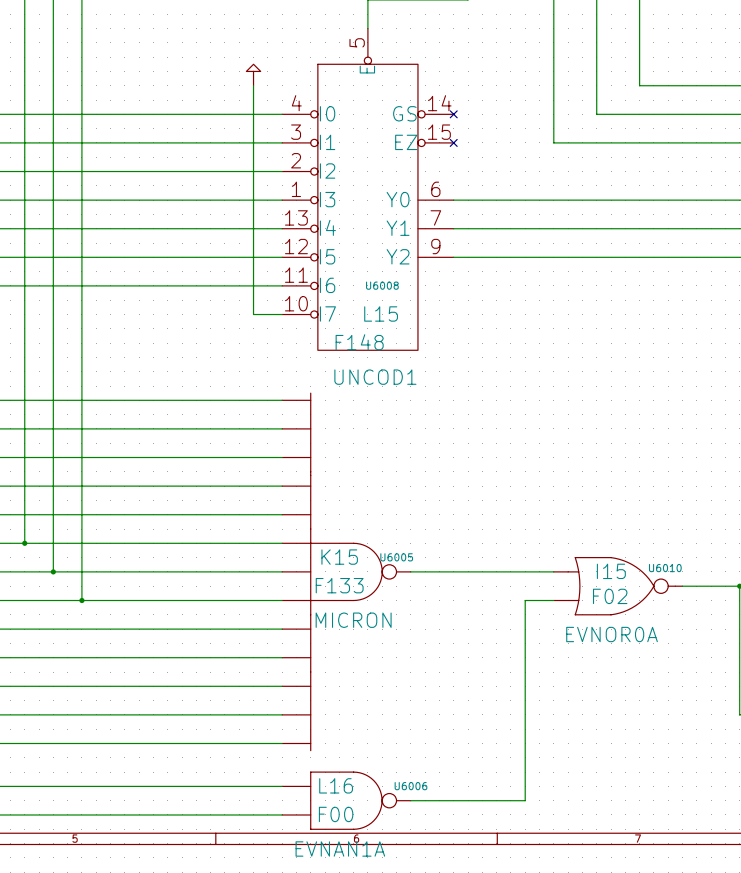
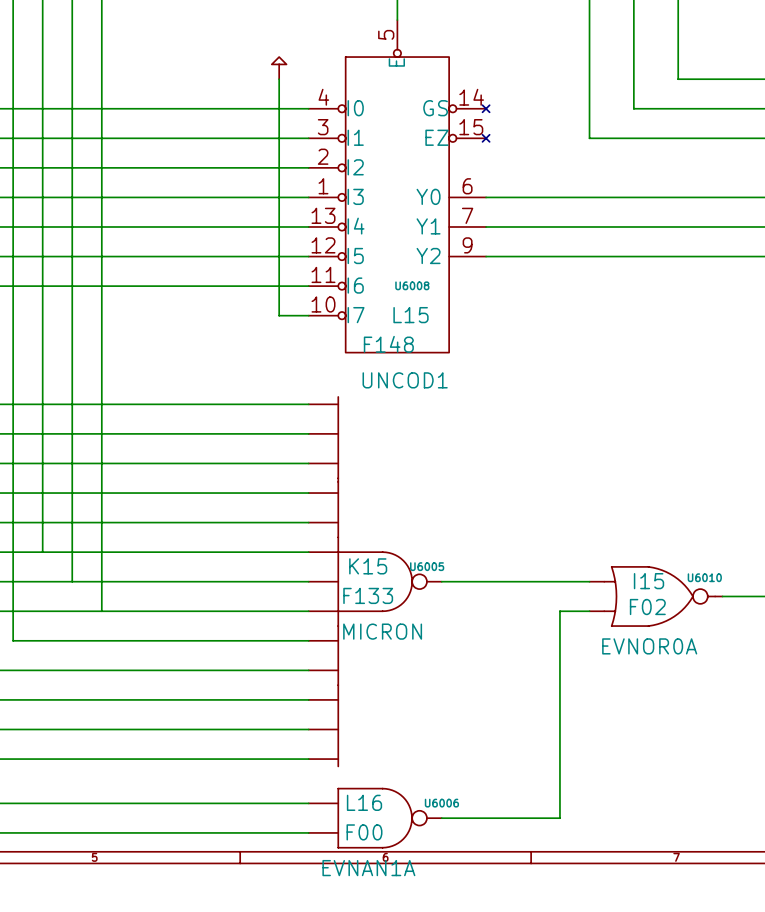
junction: (24, 543) -> none
junction: (53, 571) -> none
junction: (81, 600) -> none

